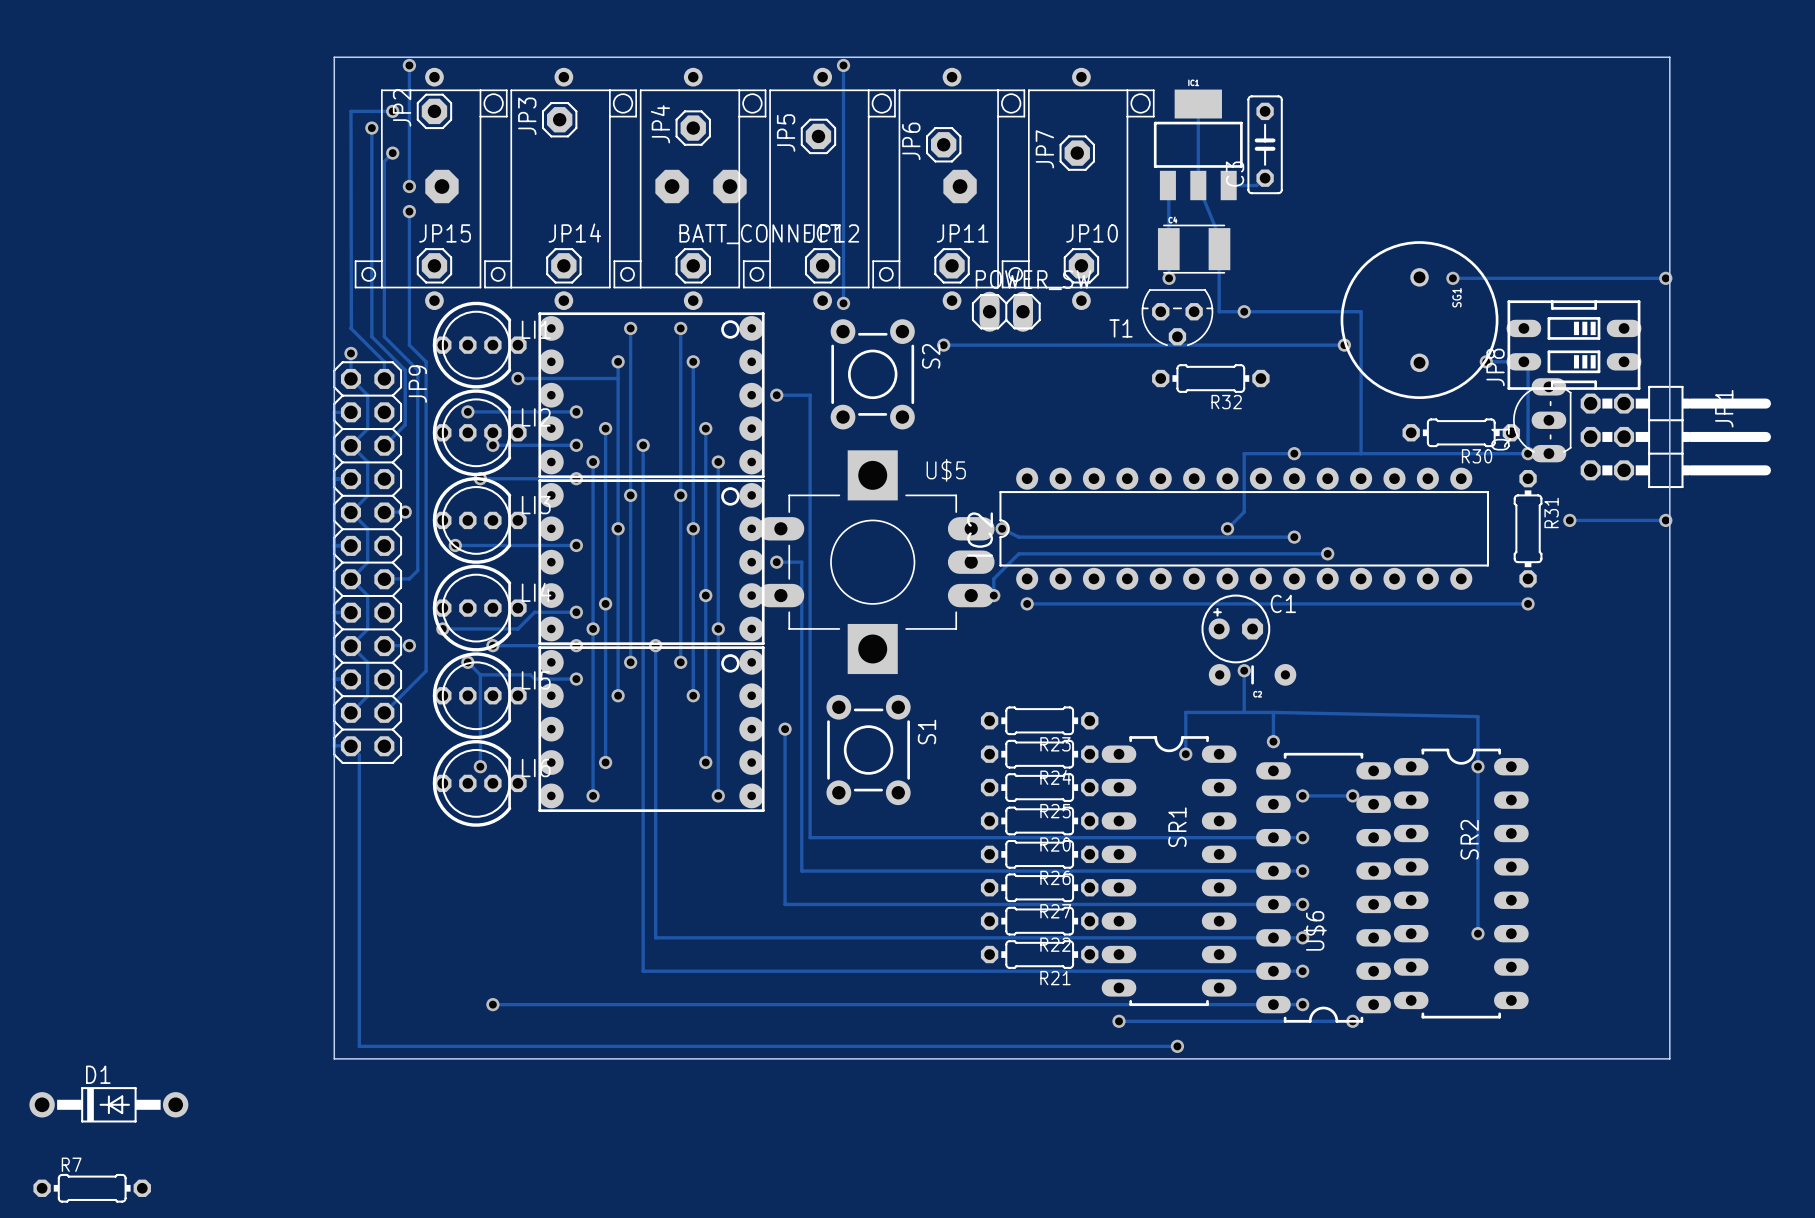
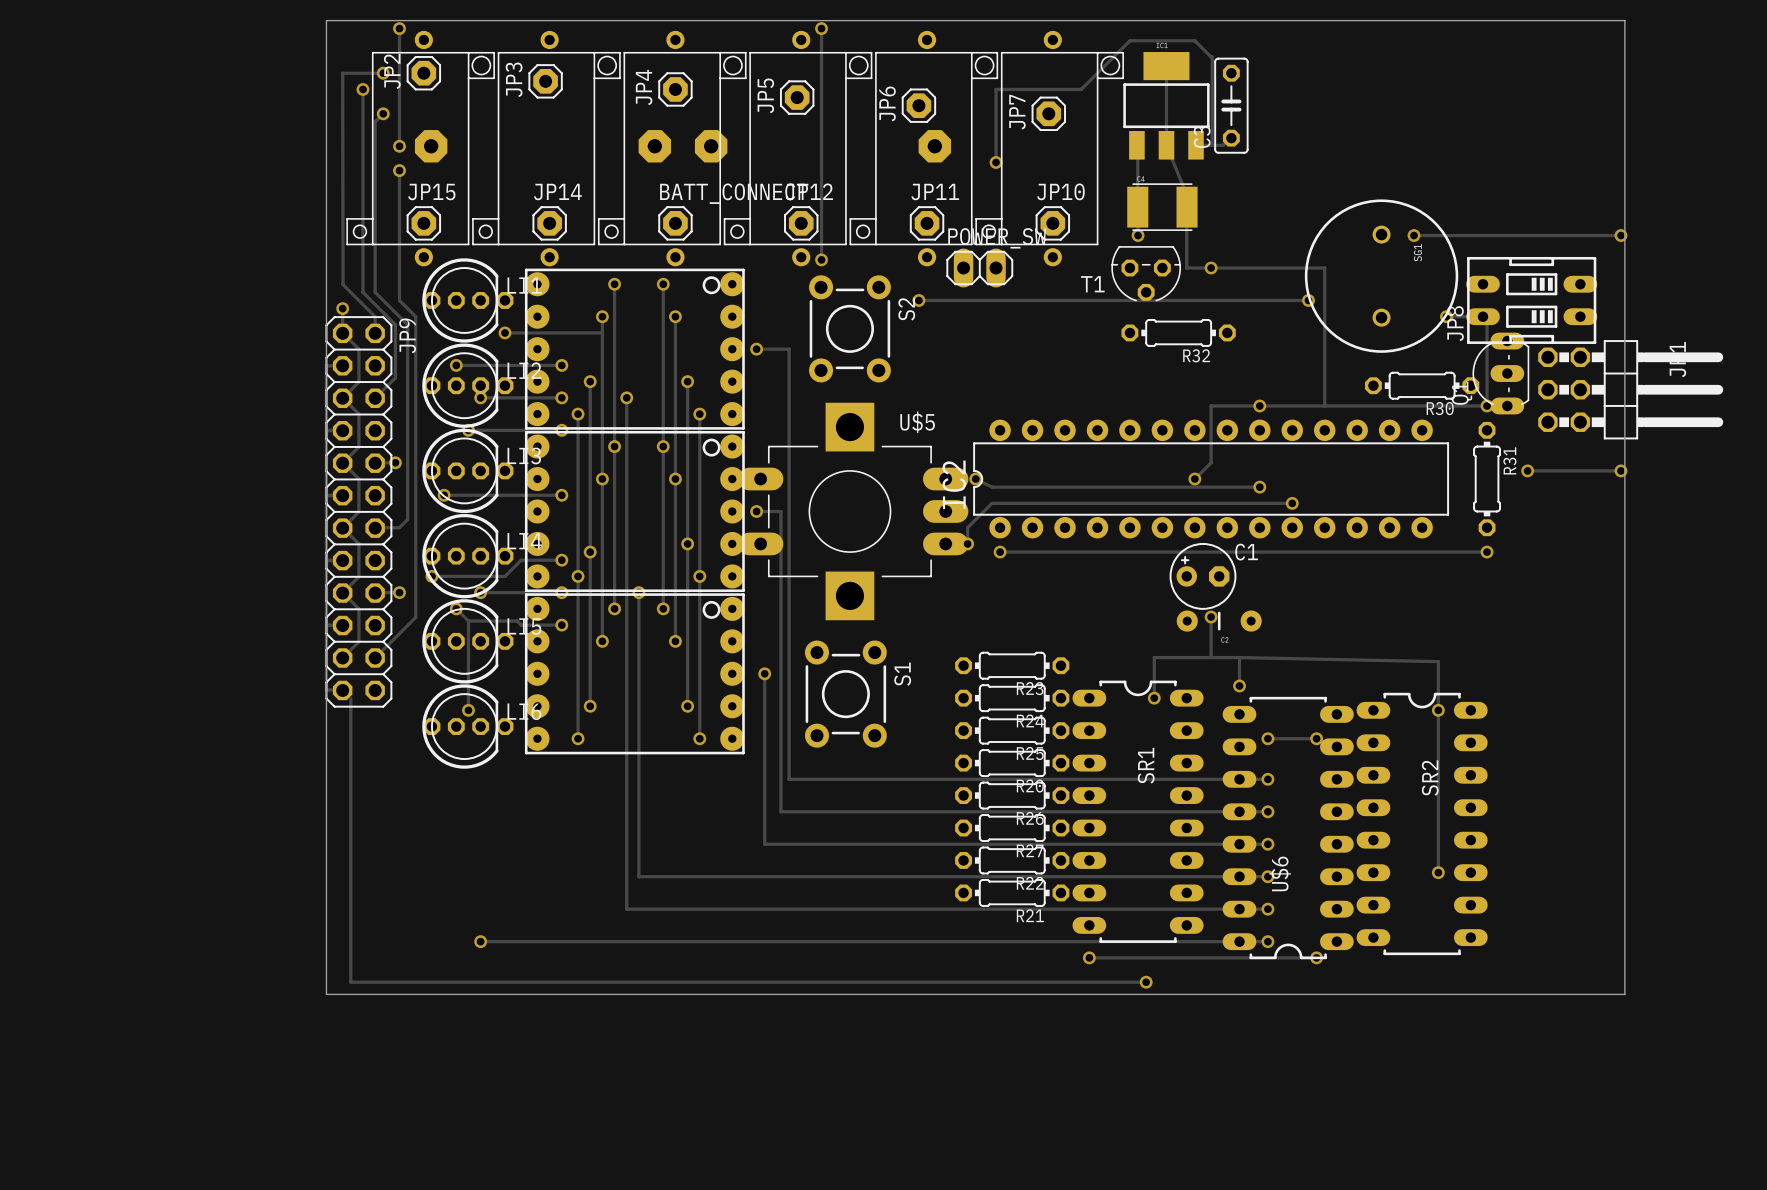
track: none -> (1212, 145) (1212, 56) (1194, 40) (1129, 40) (1081, 89) (996, 89) (996, 162)
via: none -> (996, 162)
D1: (108, 1104) -> none
R7: (92, 1188) -> none

